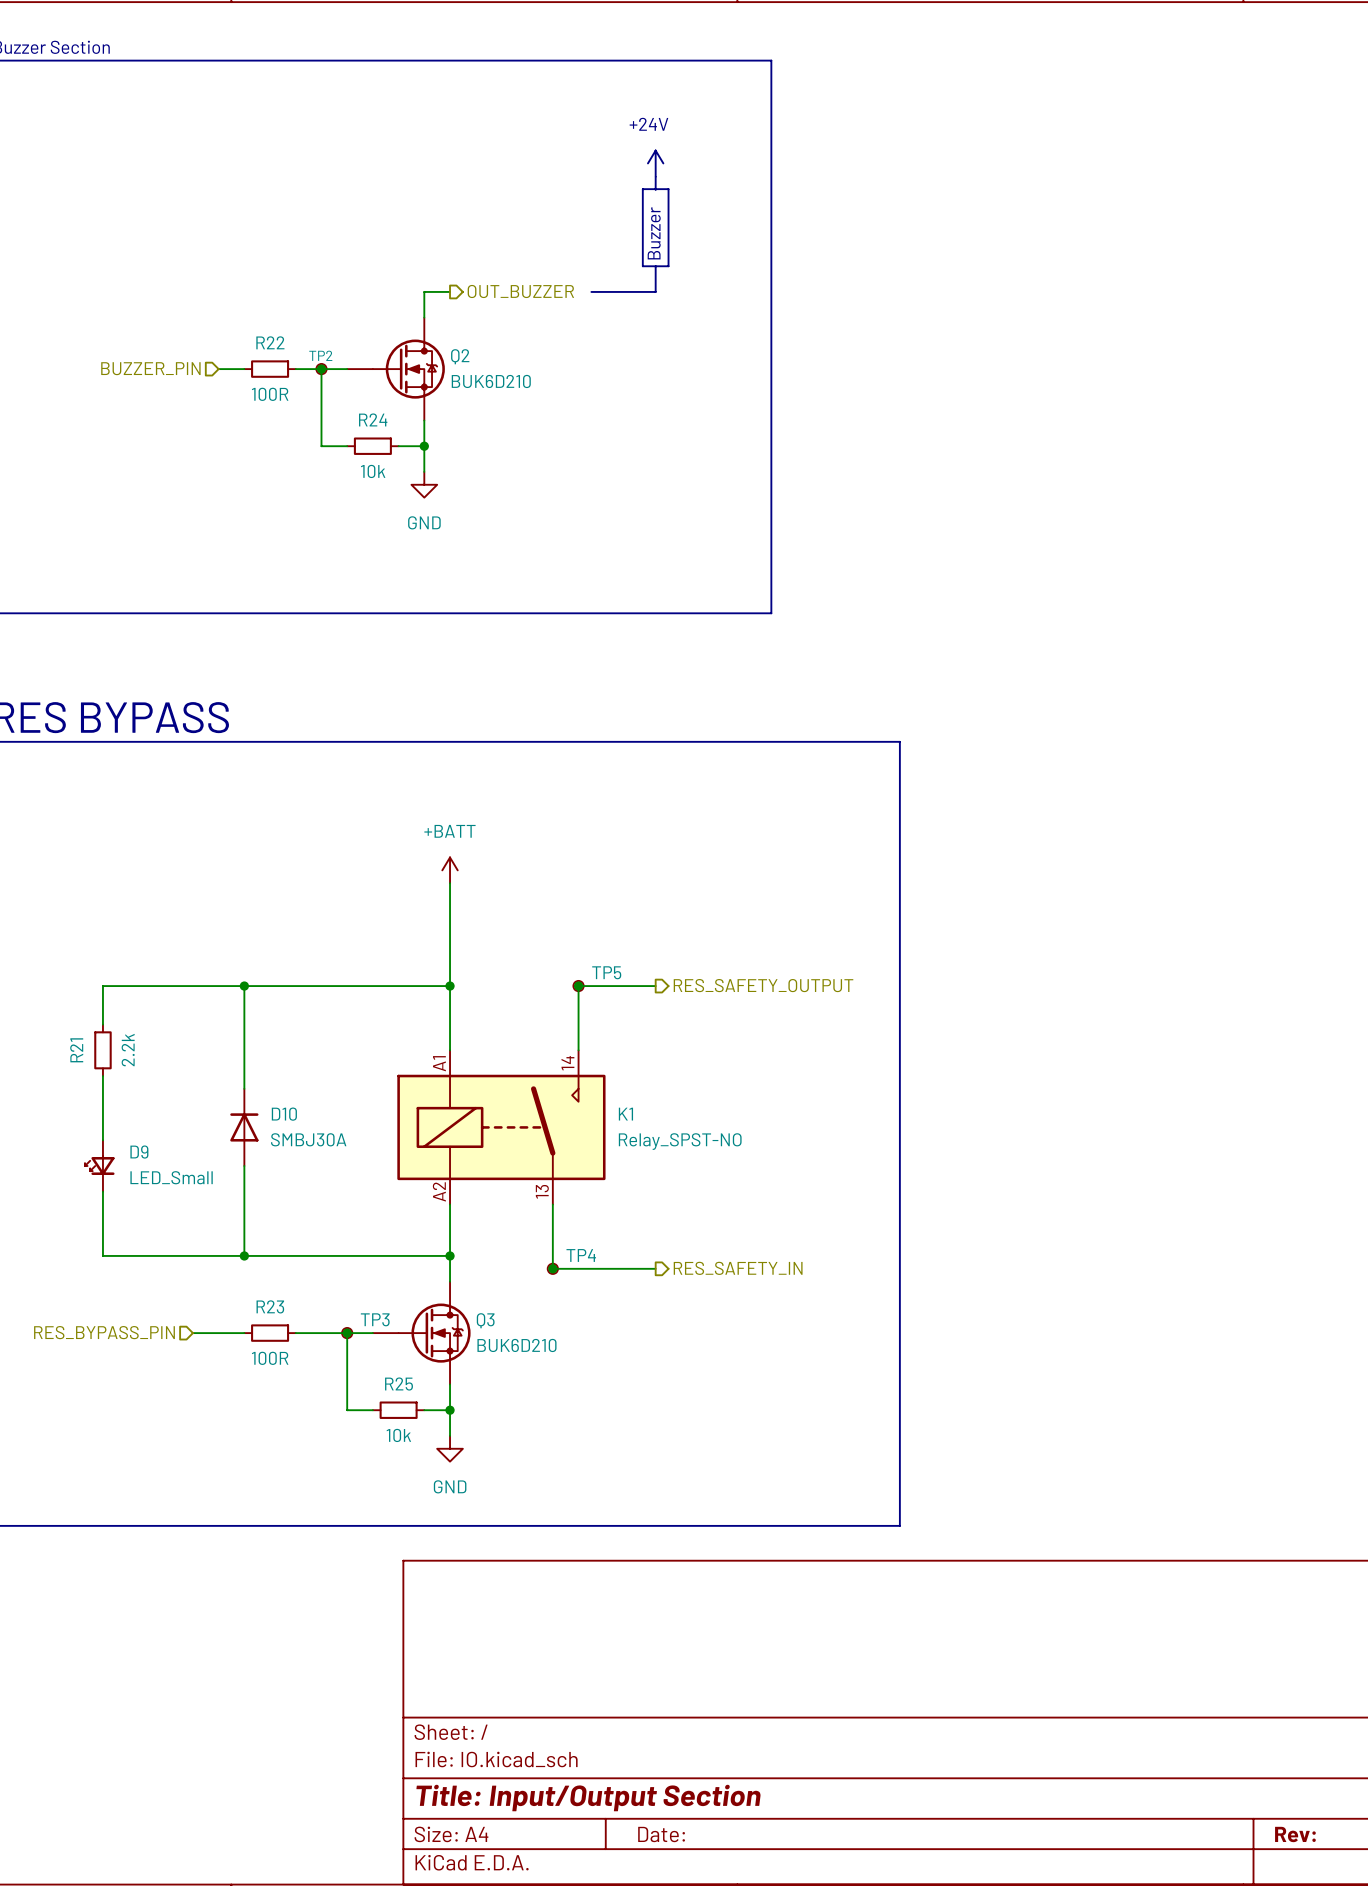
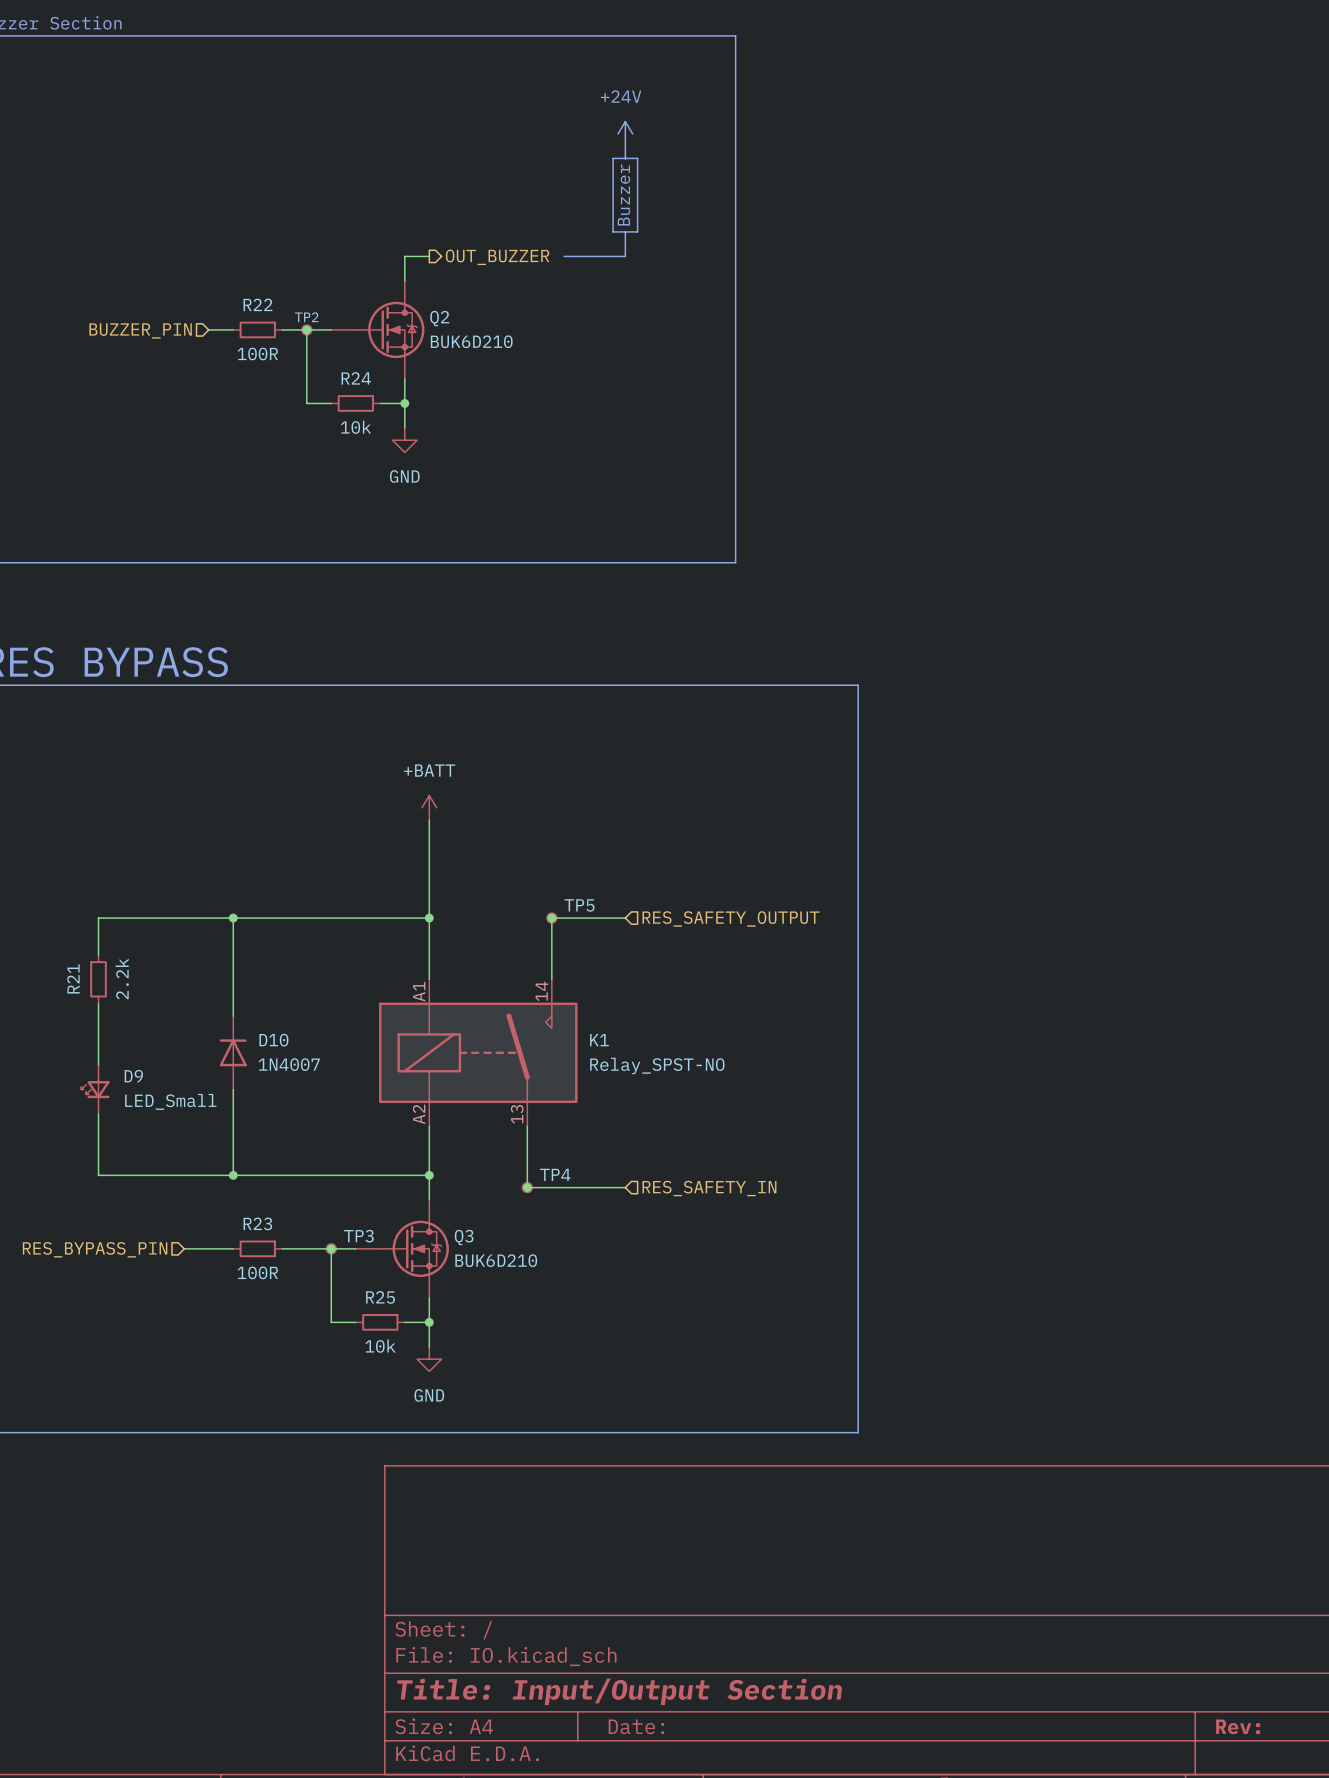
hierarchical label shape: output (763, 985) -> input (731, 918)
D10 value: SMBJ30A (308, 1139) -> 1N4007 (289, 1064)
hierarchical label shape: output (738, 1268) -> input (709, 1188)

